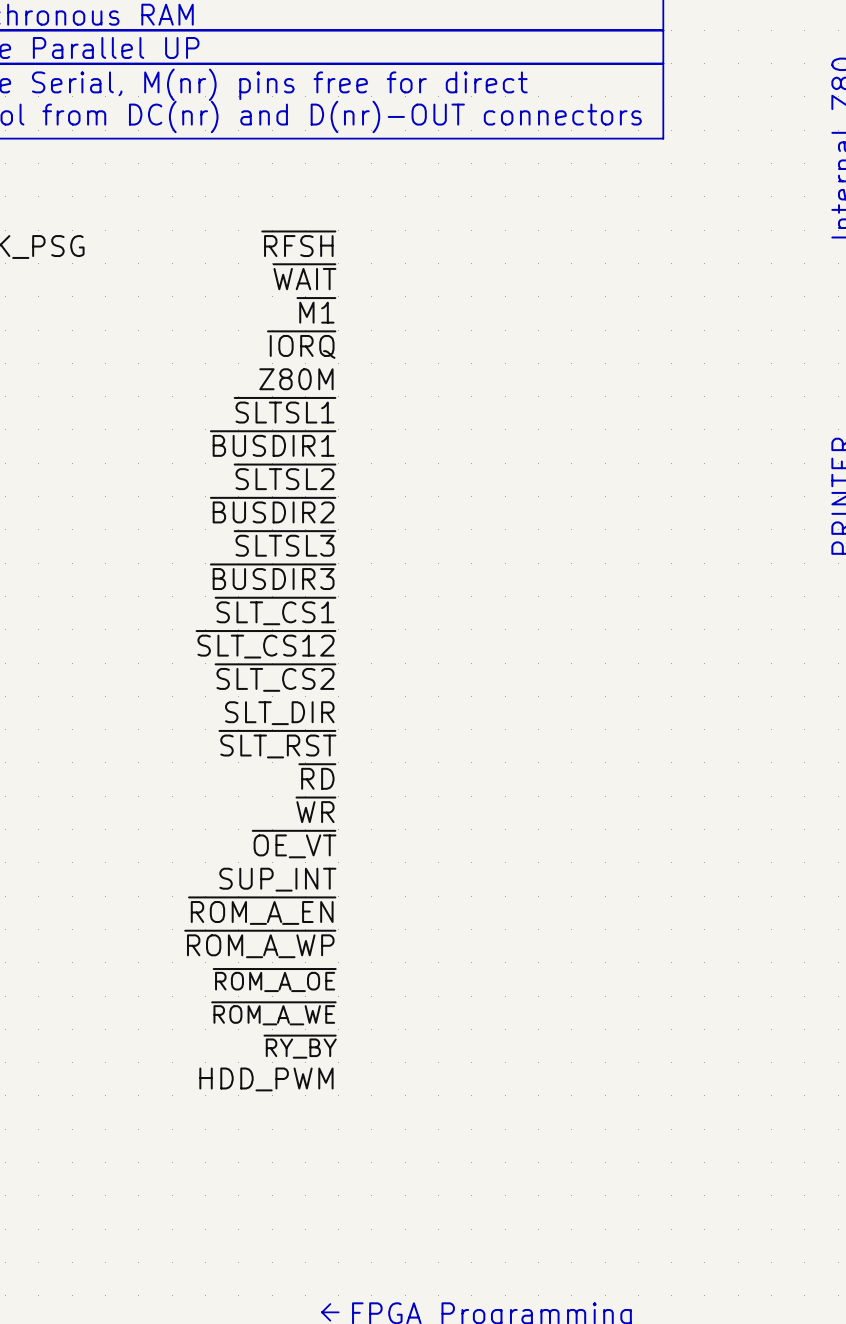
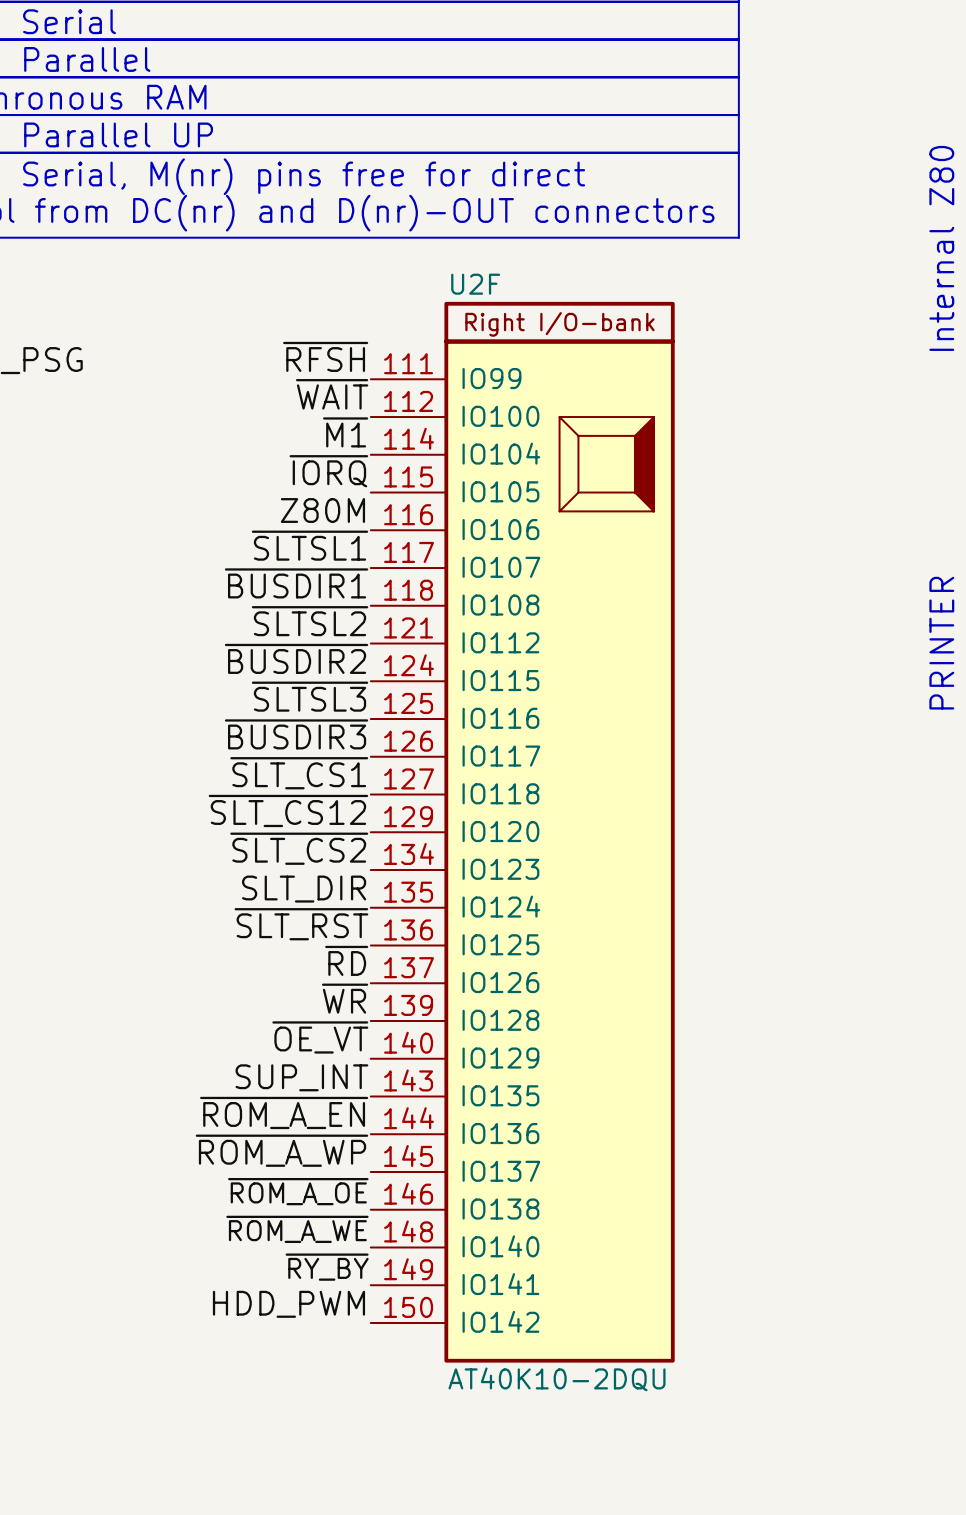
U2F: none -> AT40K10-2DQU (522, 832)

